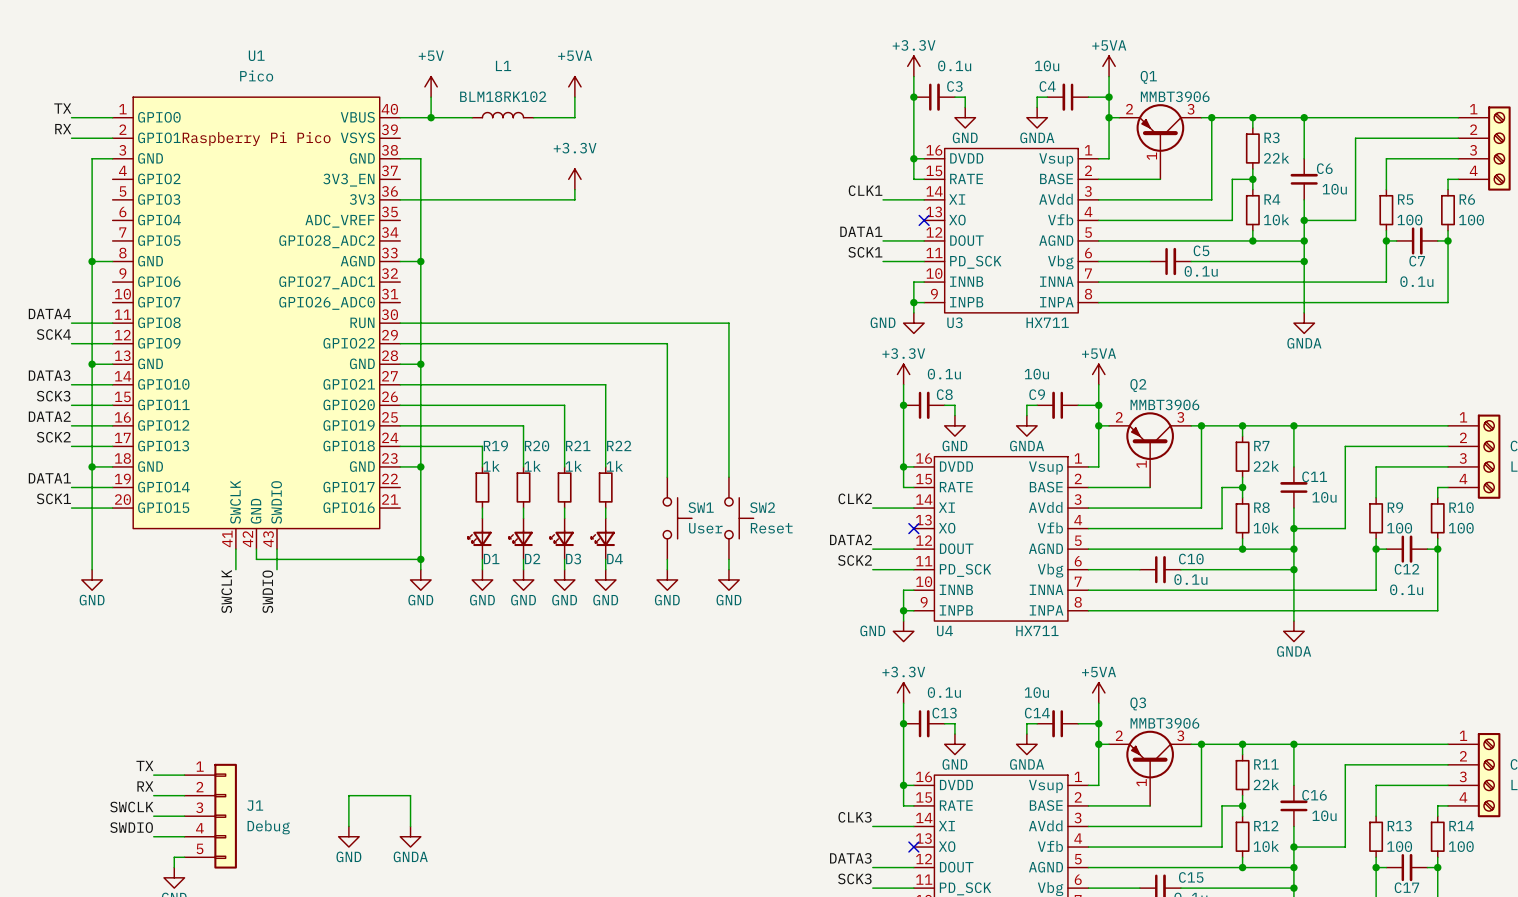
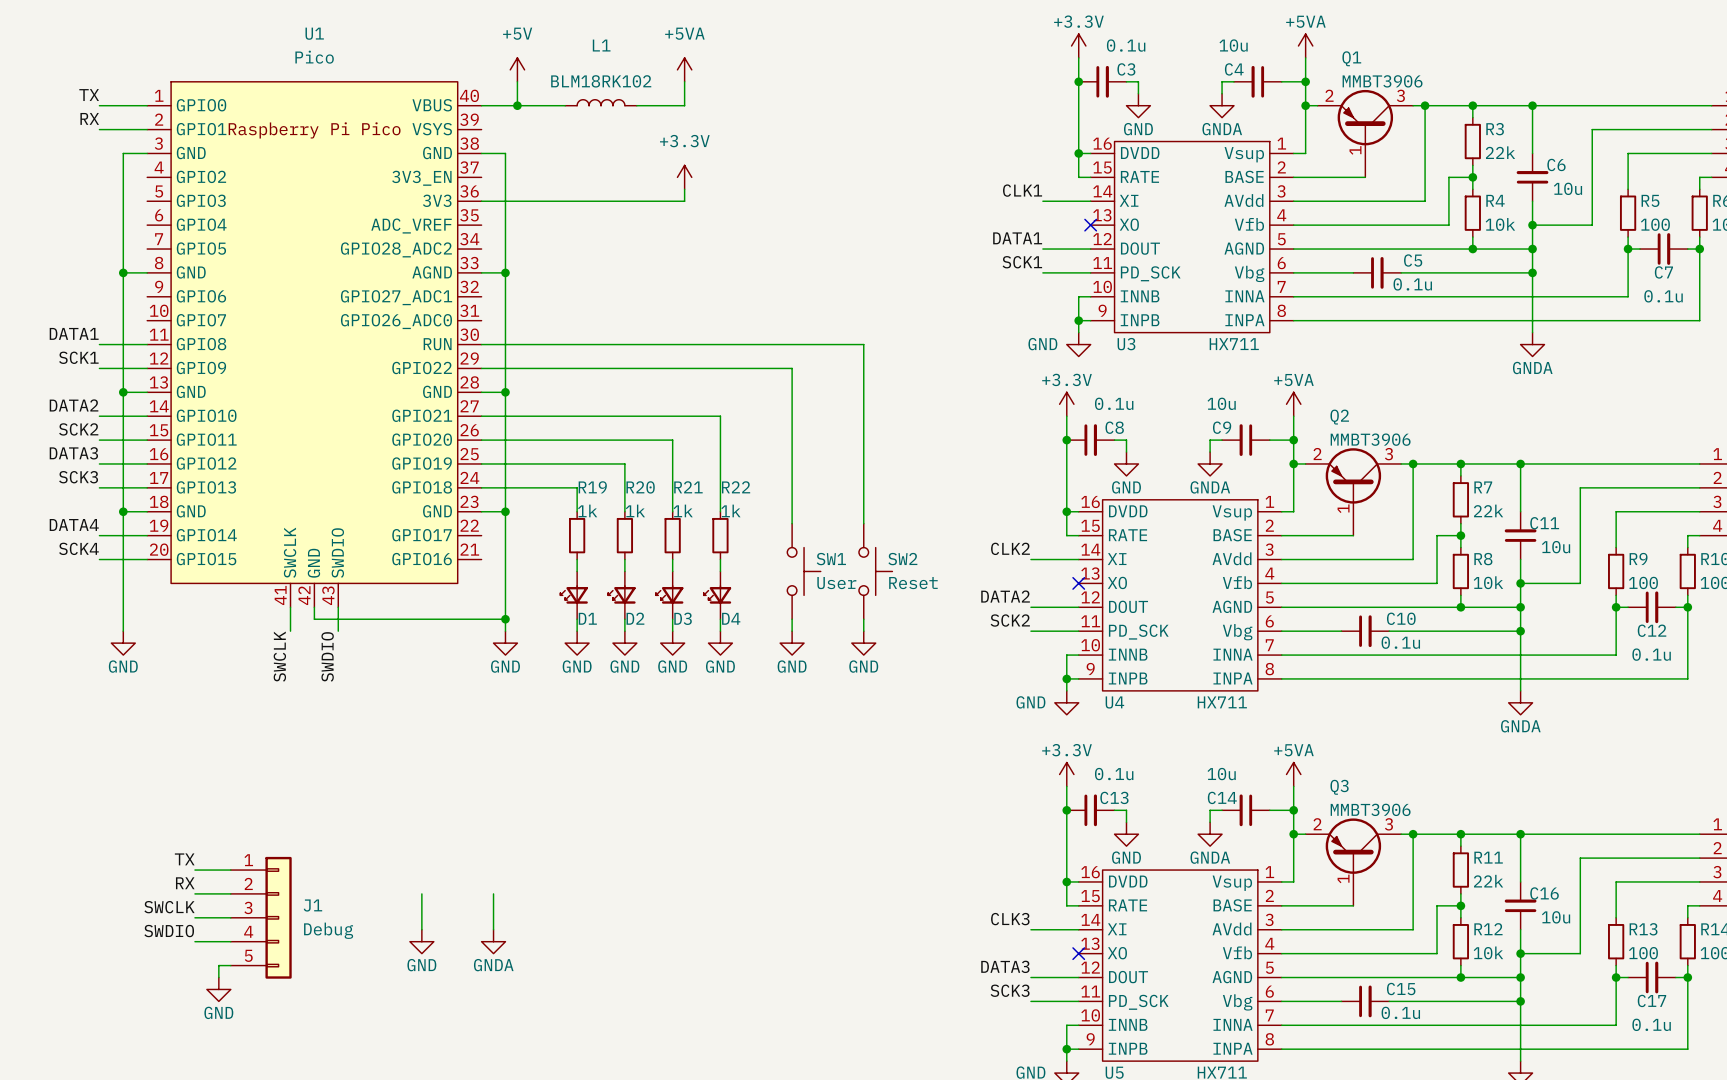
label: DATA4 (49, 313) -> DATA1 (74, 333)
label: SCK4 (53, 334) -> SCK1 (78, 357)
label: DATA3 (49, 375) -> DATA2 (74, 405)
label: SCK3 (53, 396) -> SCK2 (78, 429)
label: DATA2 (49, 416) -> DATA3 (73, 453)
label: SCK2 (53, 437) -> SCK3 (78, 477)
label: DATA1 (49, 478) -> DATA4 (74, 524)
label: SCK1 (53, 498) -> SCK4 (78, 548)
wire: (348, 795) (410, 795) -> none

